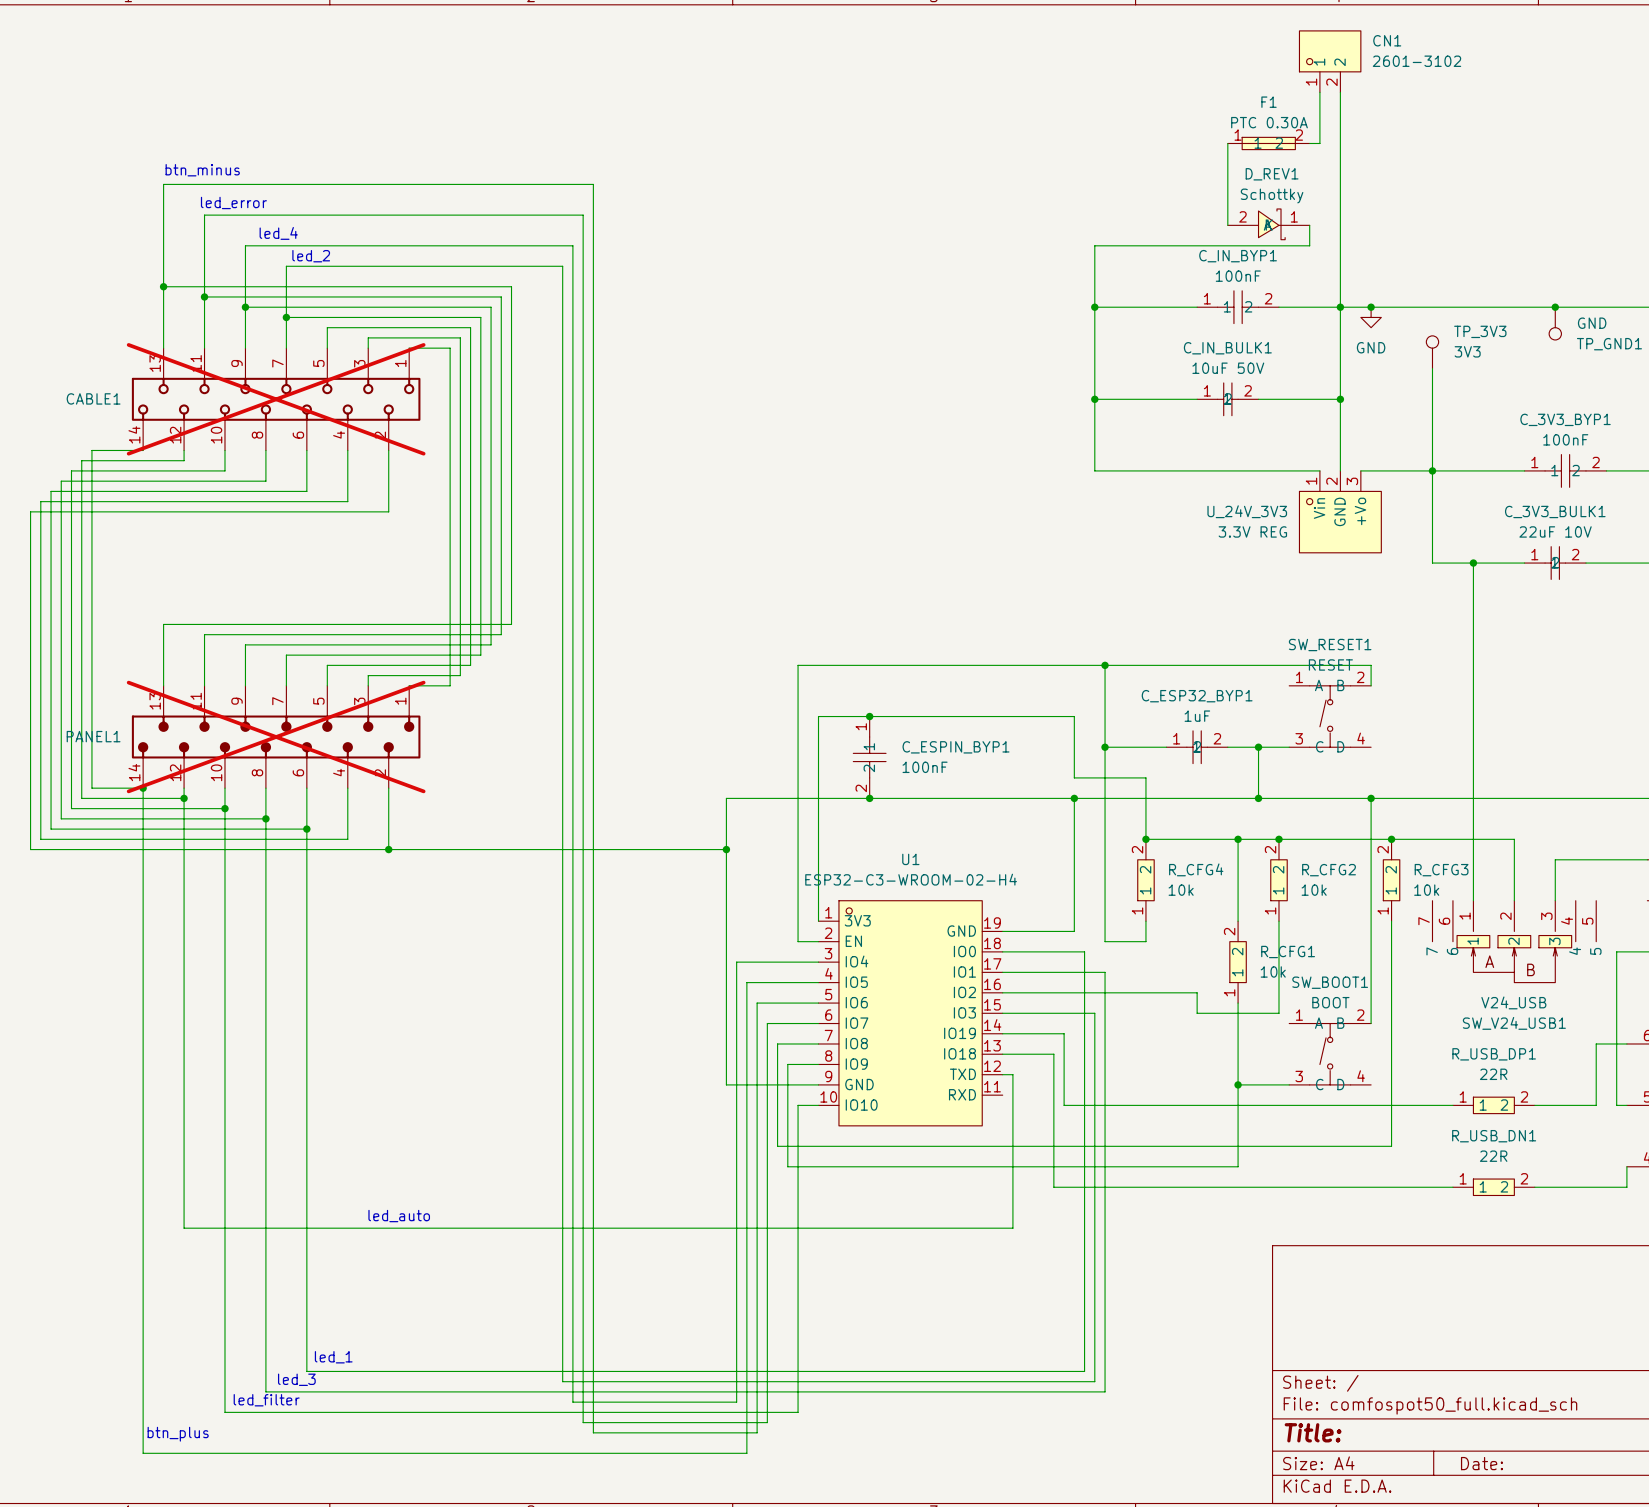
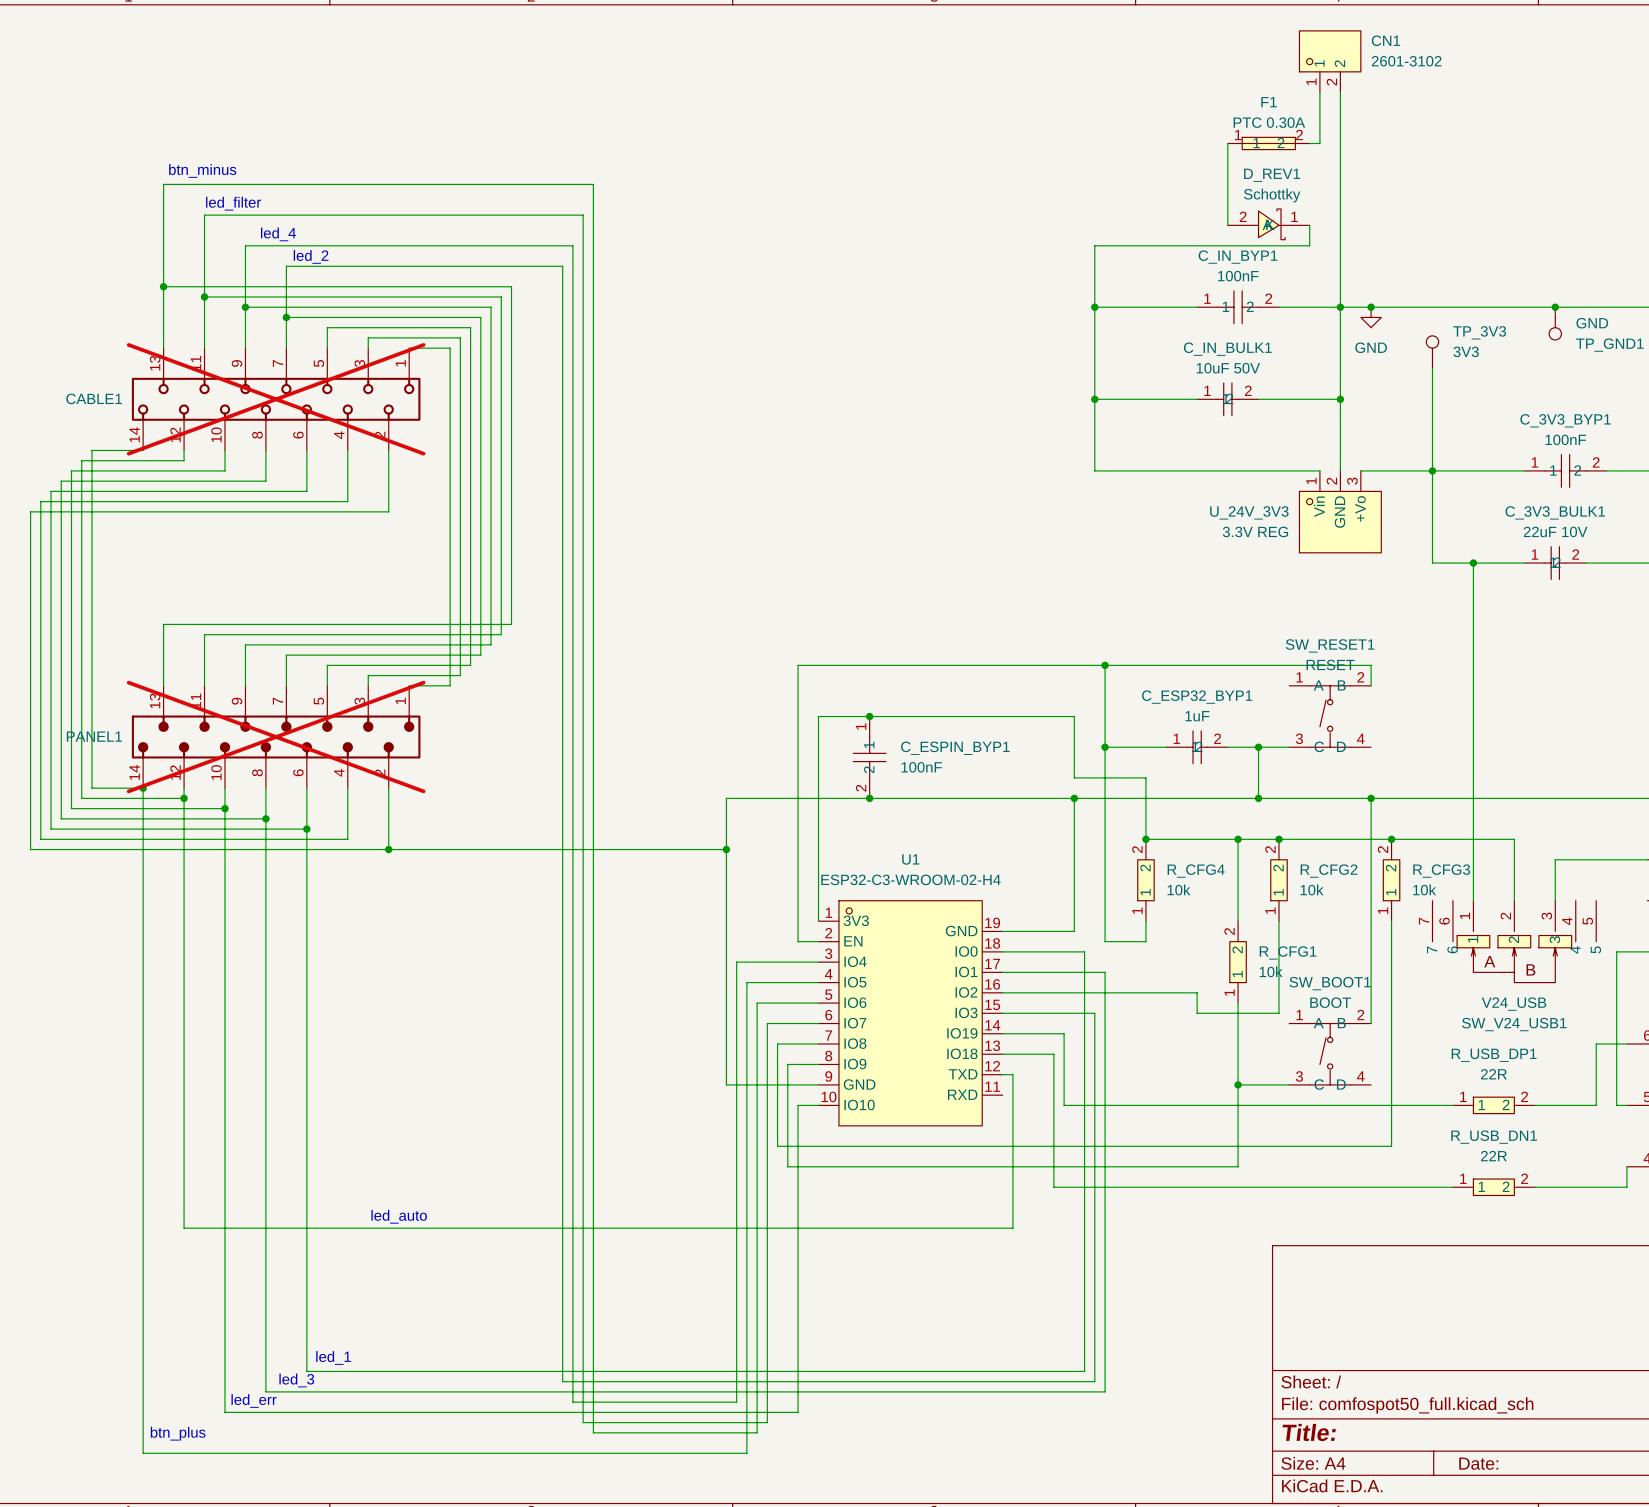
text: led_error (233, 202) -> led_filter (233, 203)
text: led_filter (266, 1400) -> led_err (254, 1400)

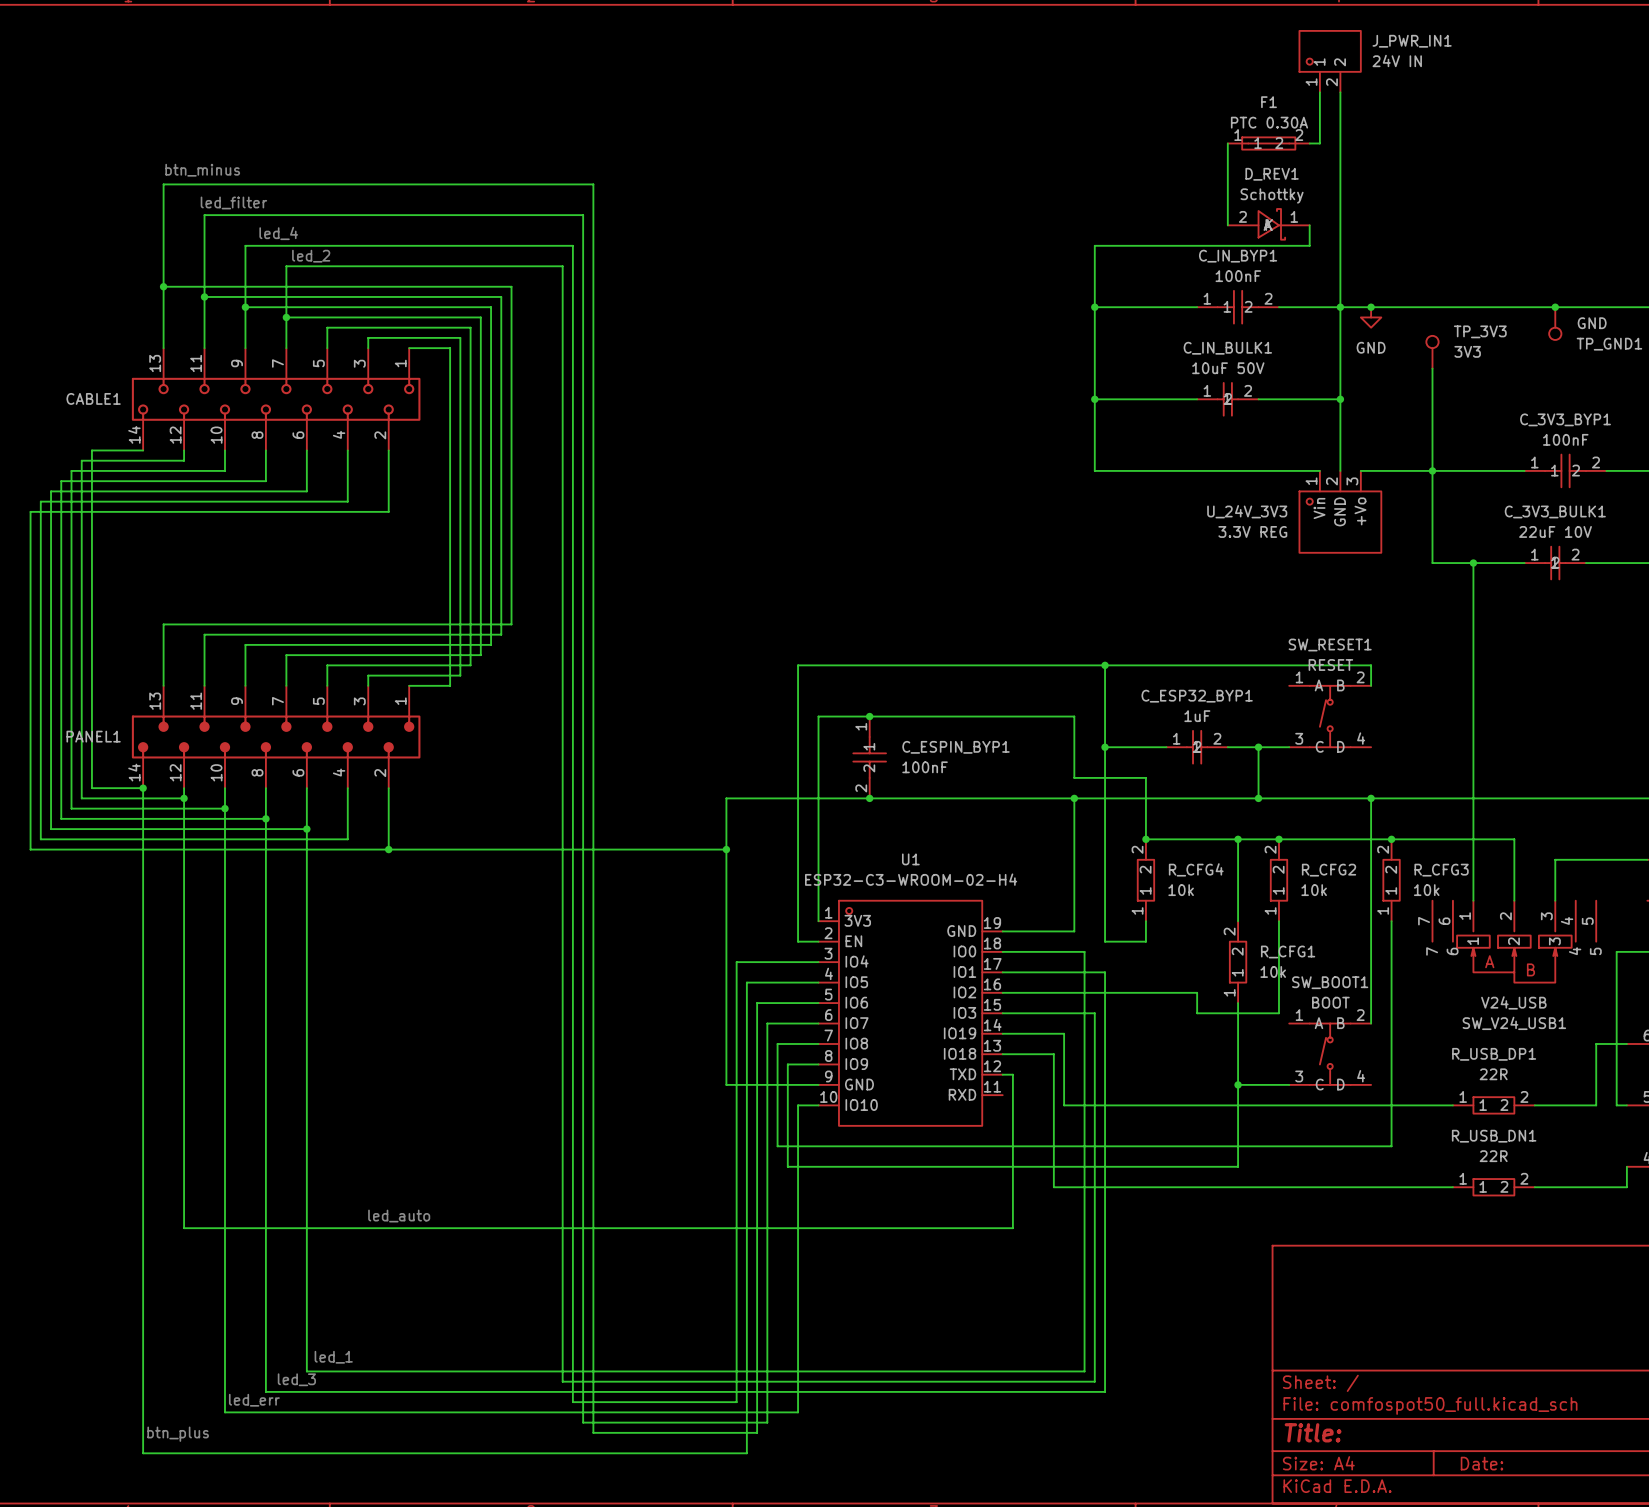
CN1 name: CN1 (1385, 40) -> J_PWR_IN1 (1412, 41)
CN1 value: 2601-3102 (1406, 61) -> 24V IN (1397, 60)
CABLE1 do-not-place cross: (276, 399) -> none
PANEL1 do-not-place cross: (276, 737) -> none

